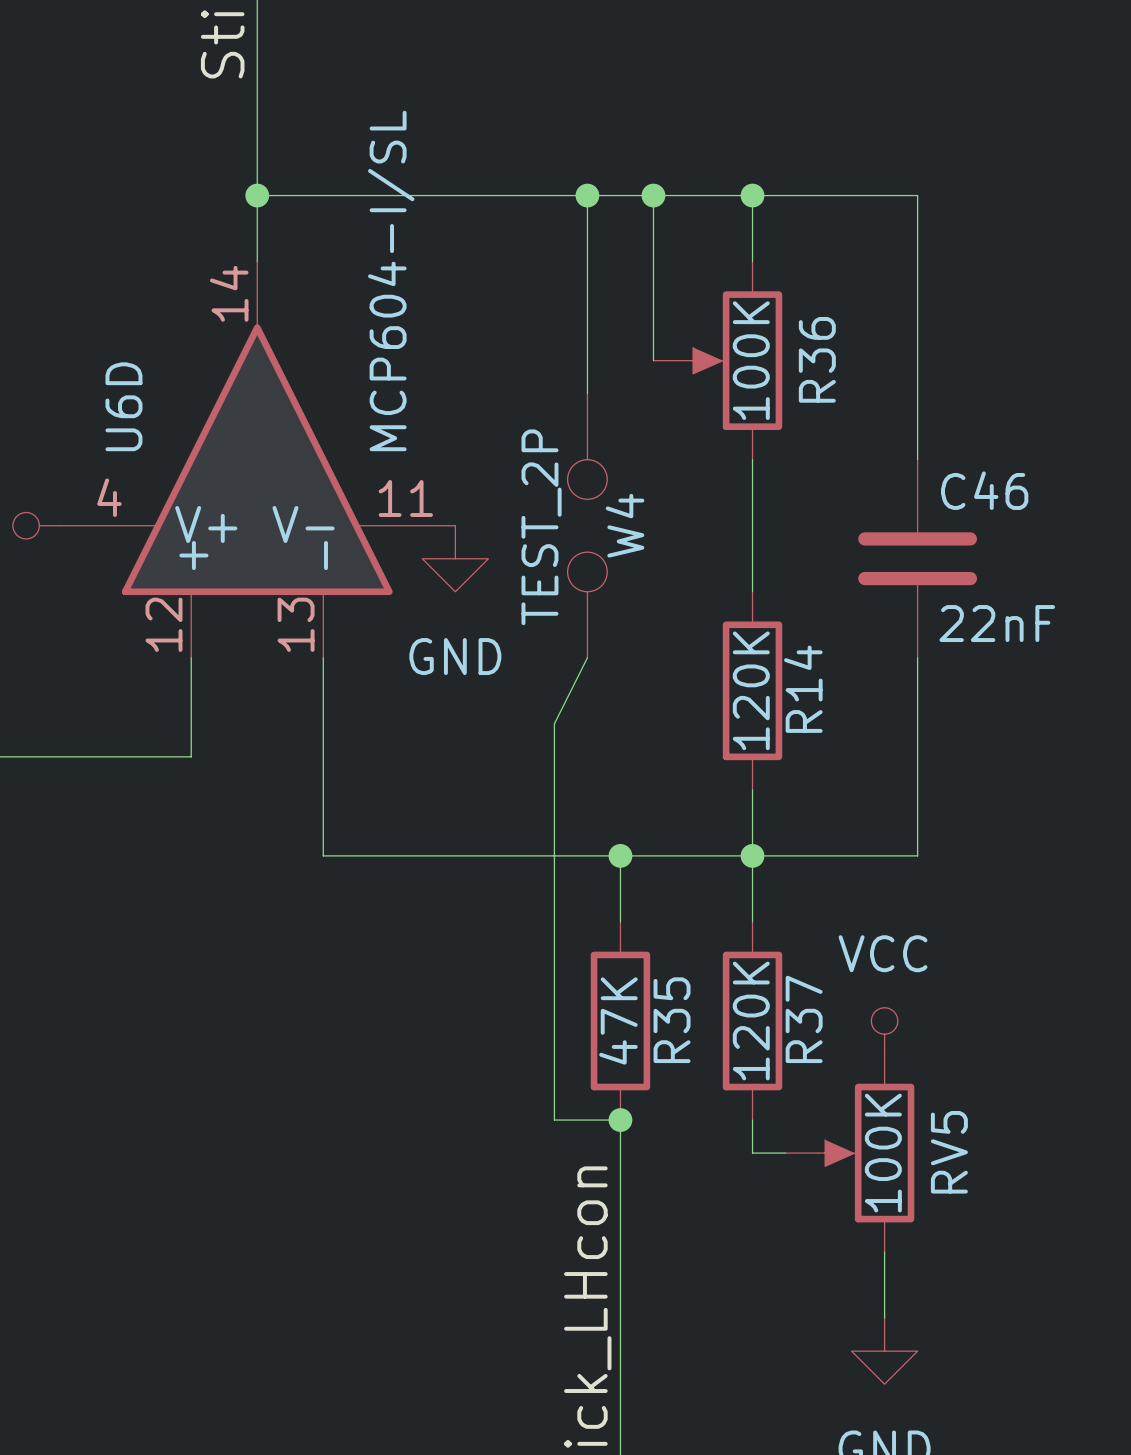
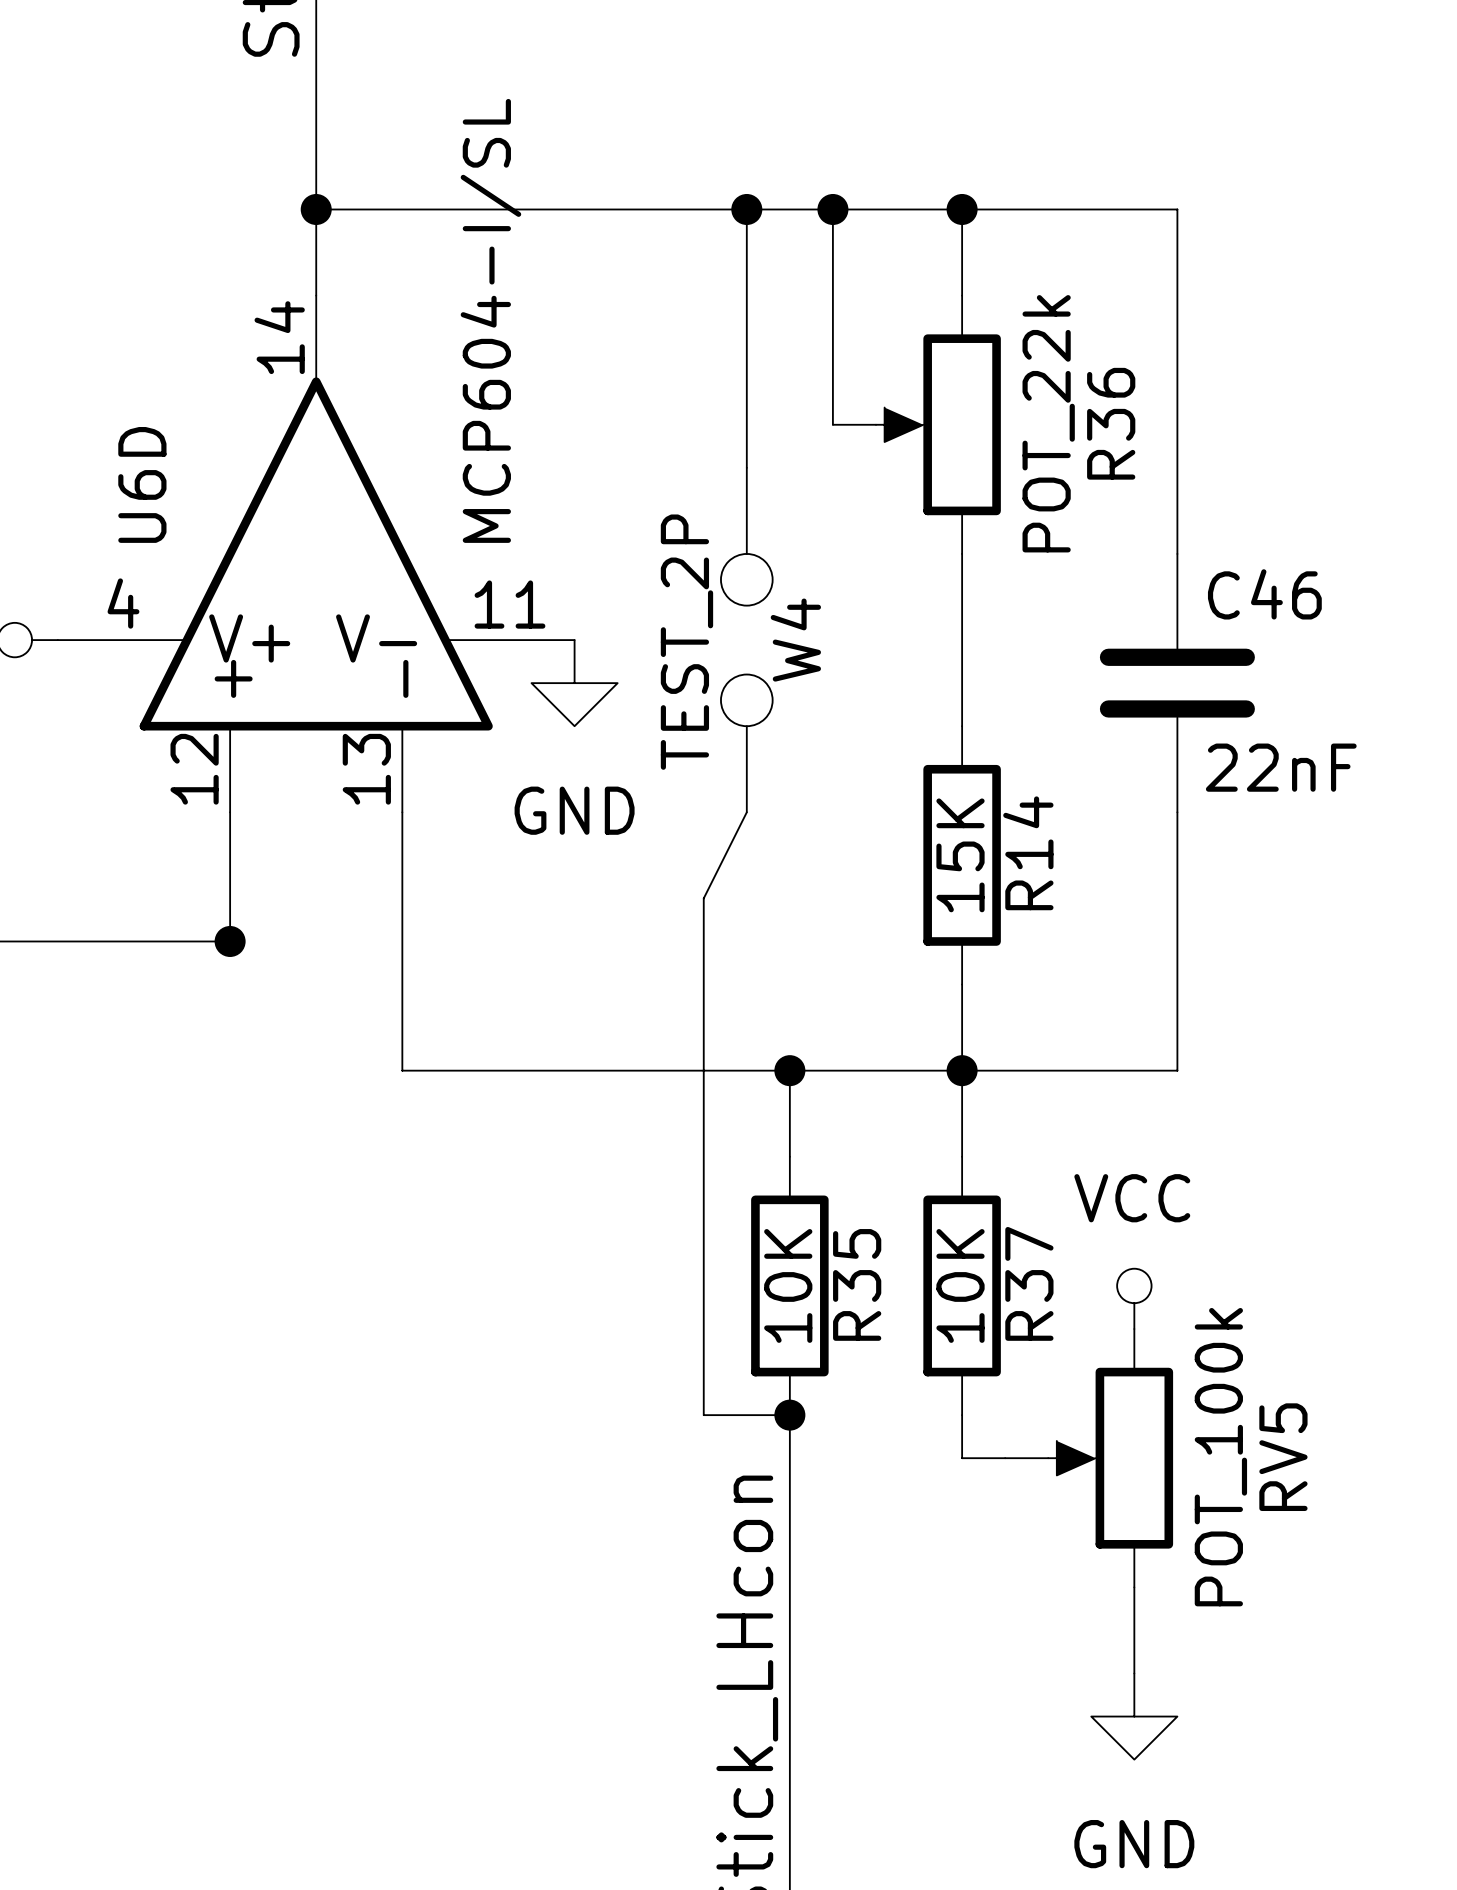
R36 name position: R36 (817, 359) -> R36 (1111, 423)
R36 value: 100K (751, 360) -> POT_22k (1048, 423)
R14 value: 120K (751, 690) -> 15K (960, 855)
junction: none -> (230, 941)
R35 value: 47K (618, 1020) -> 10K (788, 1285)
R37 value: 120K (751, 1020) -> 10K (960, 1285)
RV5 name position: RV5 (949, 1152) -> RV5 (1283, 1457)
RV5 value: 100K (883, 1153) -> POT_100k (1220, 1457)

